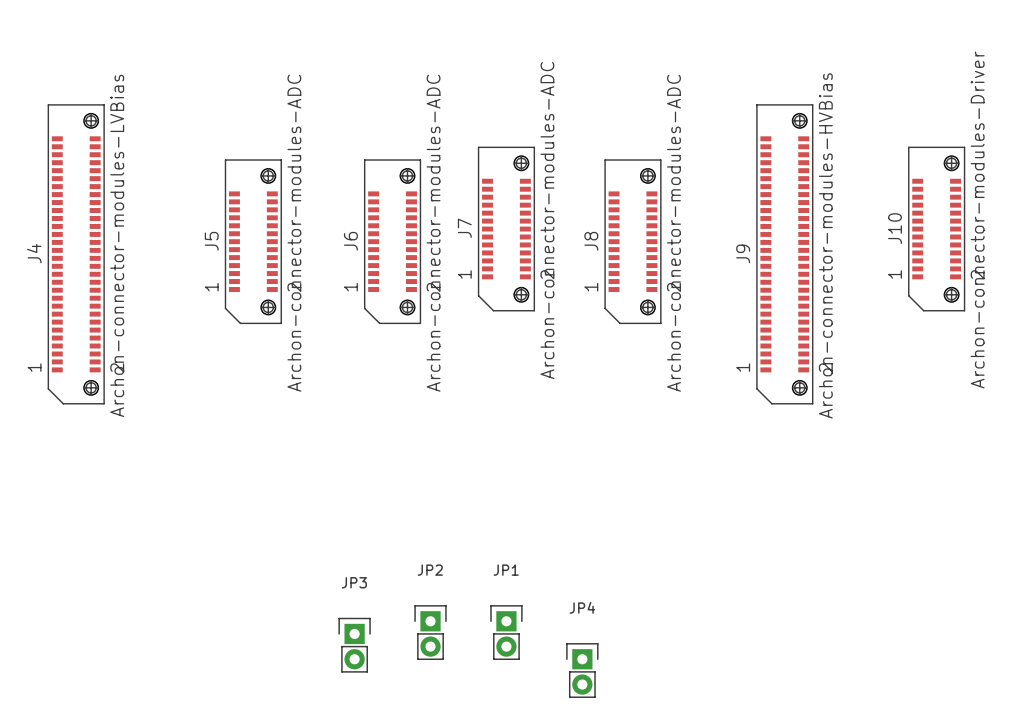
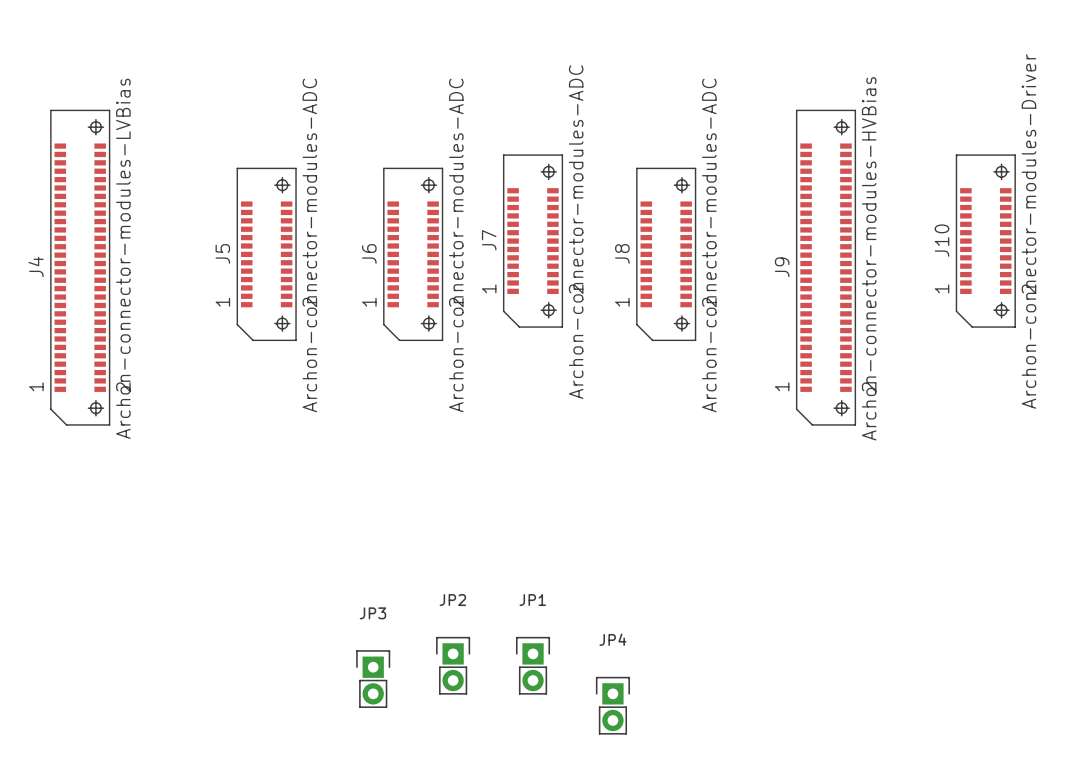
J4 footprint: [47, 104, 105, 405] -> [50, 109, 111, 426]
J9 footprint: [756, 104, 814, 405] -> [795, 109, 857, 426]
J7 footprint: [477, 146, 535, 312] -> [503, 154, 564, 328]
J10 footprint: [908, 146, 966, 312] -> [955, 154, 1016, 328]
J5 footprint: [224, 159, 282, 325] -> [236, 167, 297, 342]
J6 footprint: [364, 159, 422, 325] -> [383, 167, 444, 342]
J8 footprint: [604, 159, 662, 325] -> [636, 167, 697, 342]

